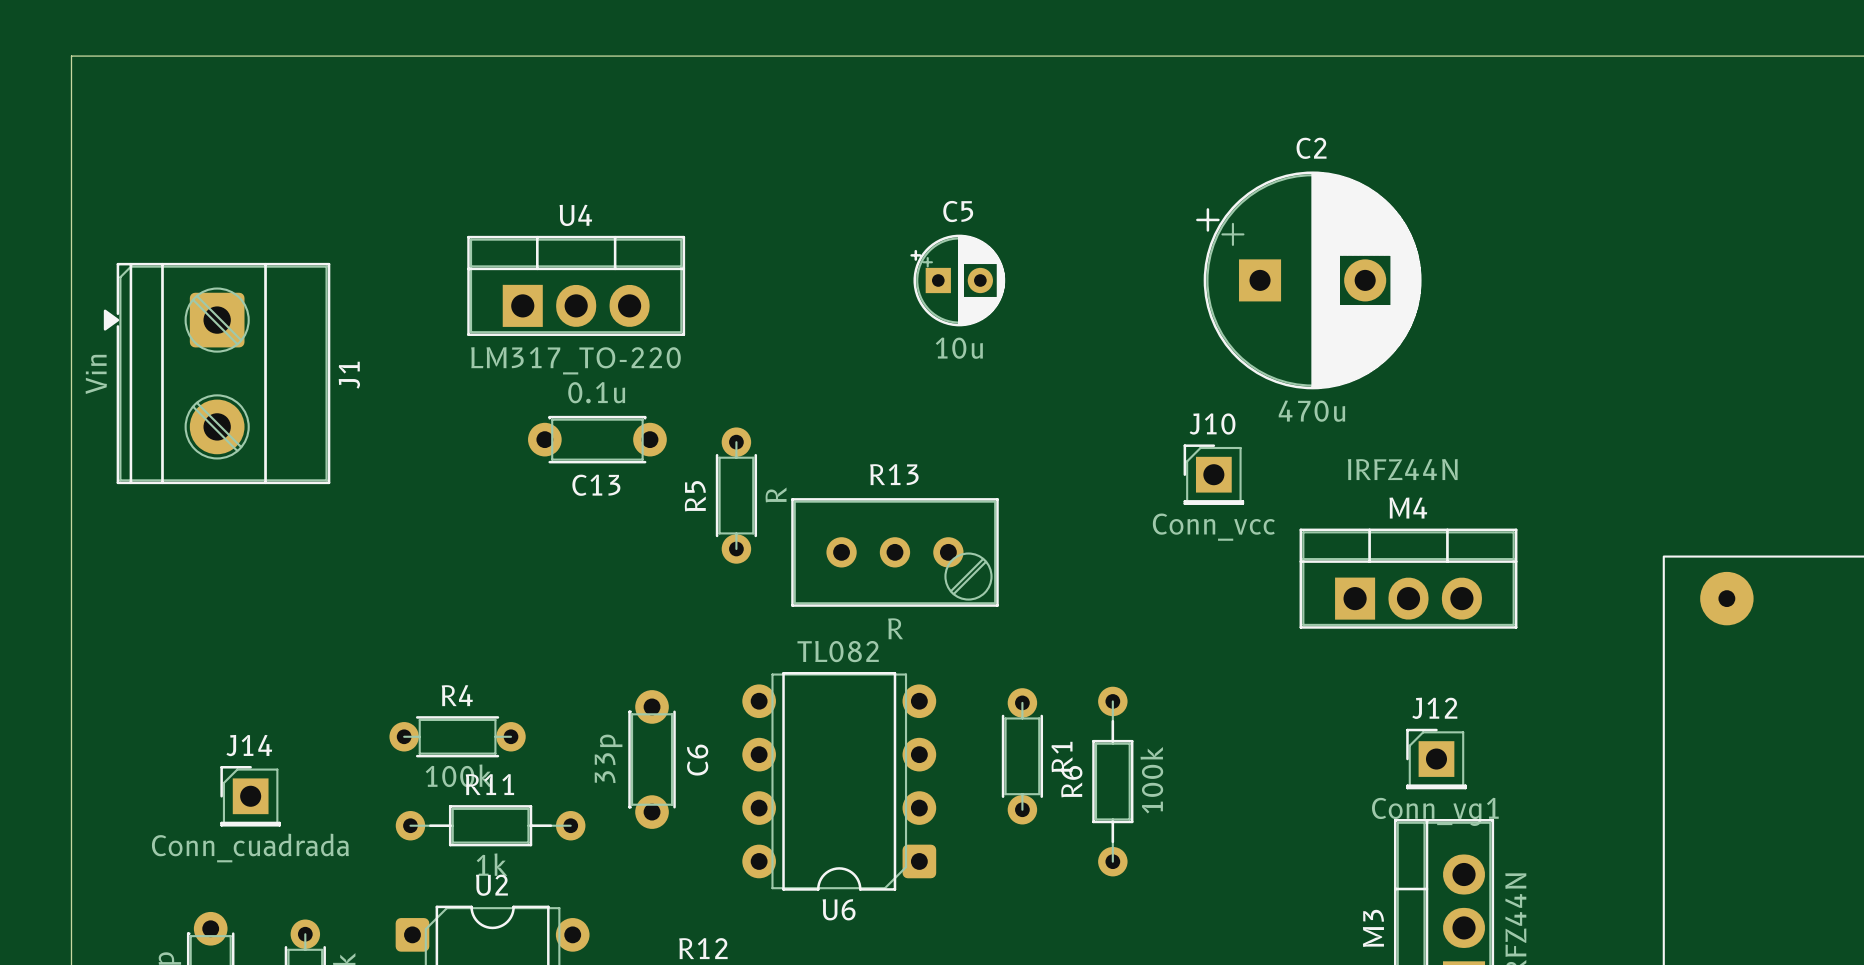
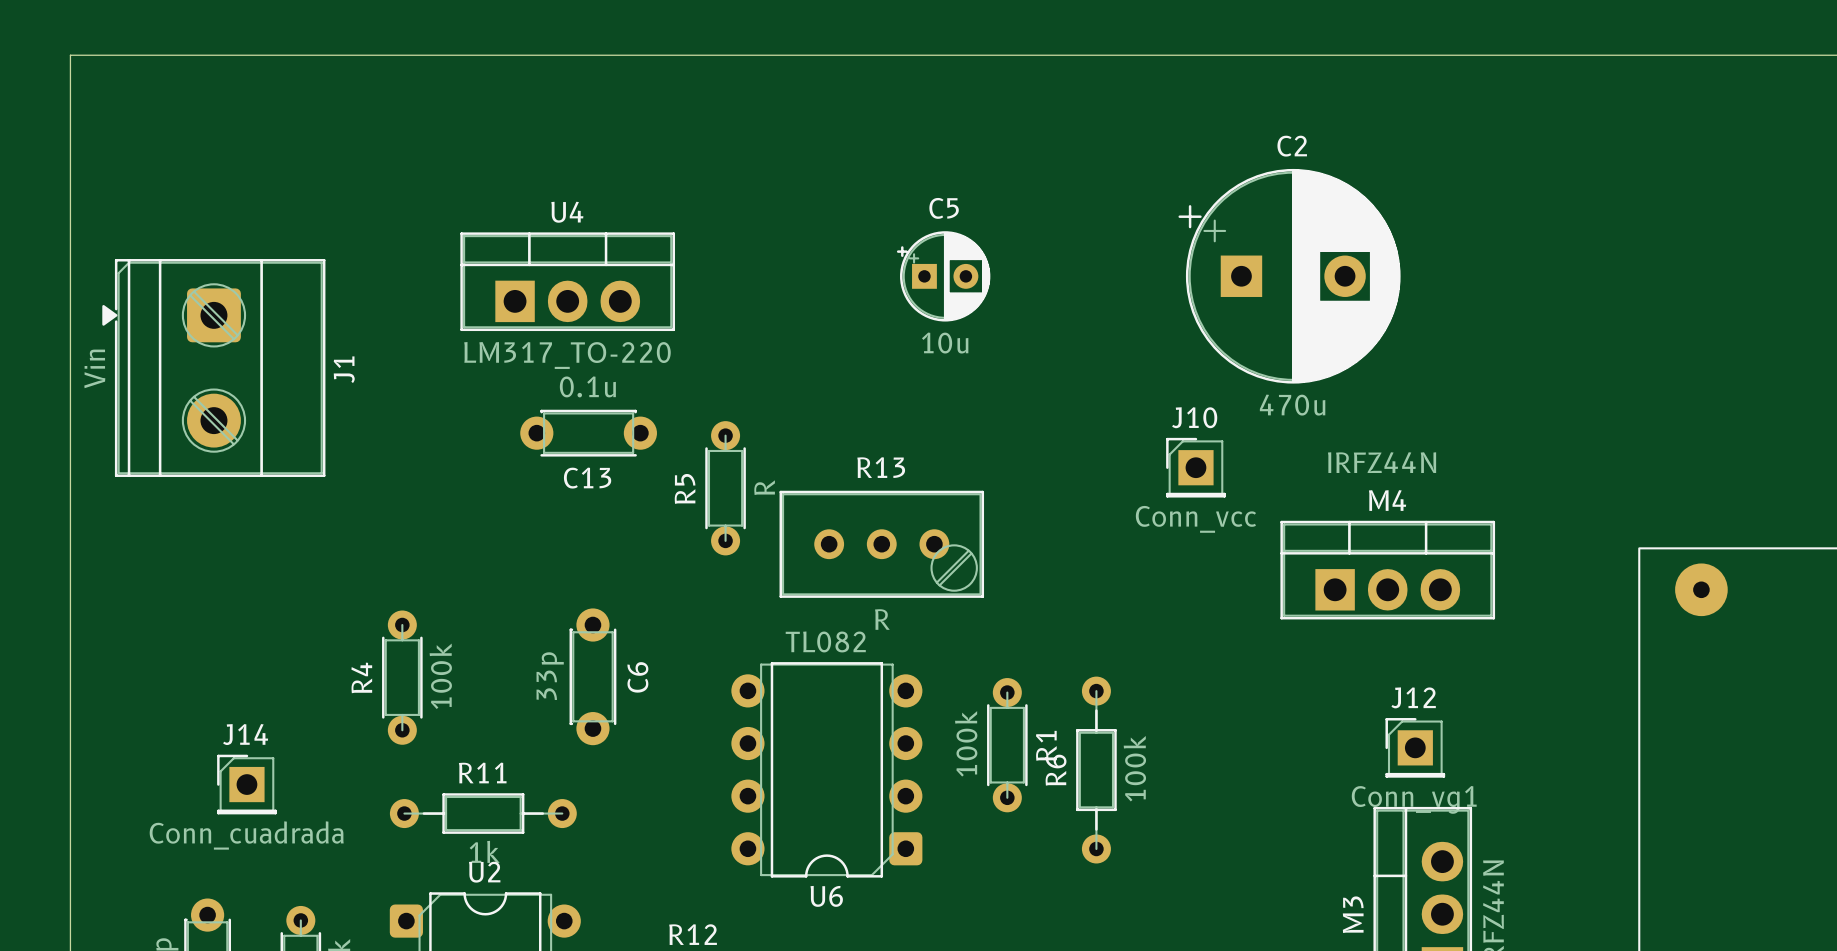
R4 name position: R4 (457, 695) -> R4 (361, 677)
R4 rotation: 0° (457, 736) -> 90° clockwise (402, 677)
R1 value: none -> 100k (966, 743)
C6 position: (652, 759) -> (592, 676)
R4 value position: 100k (458, 775) -> 100k (440, 676)

